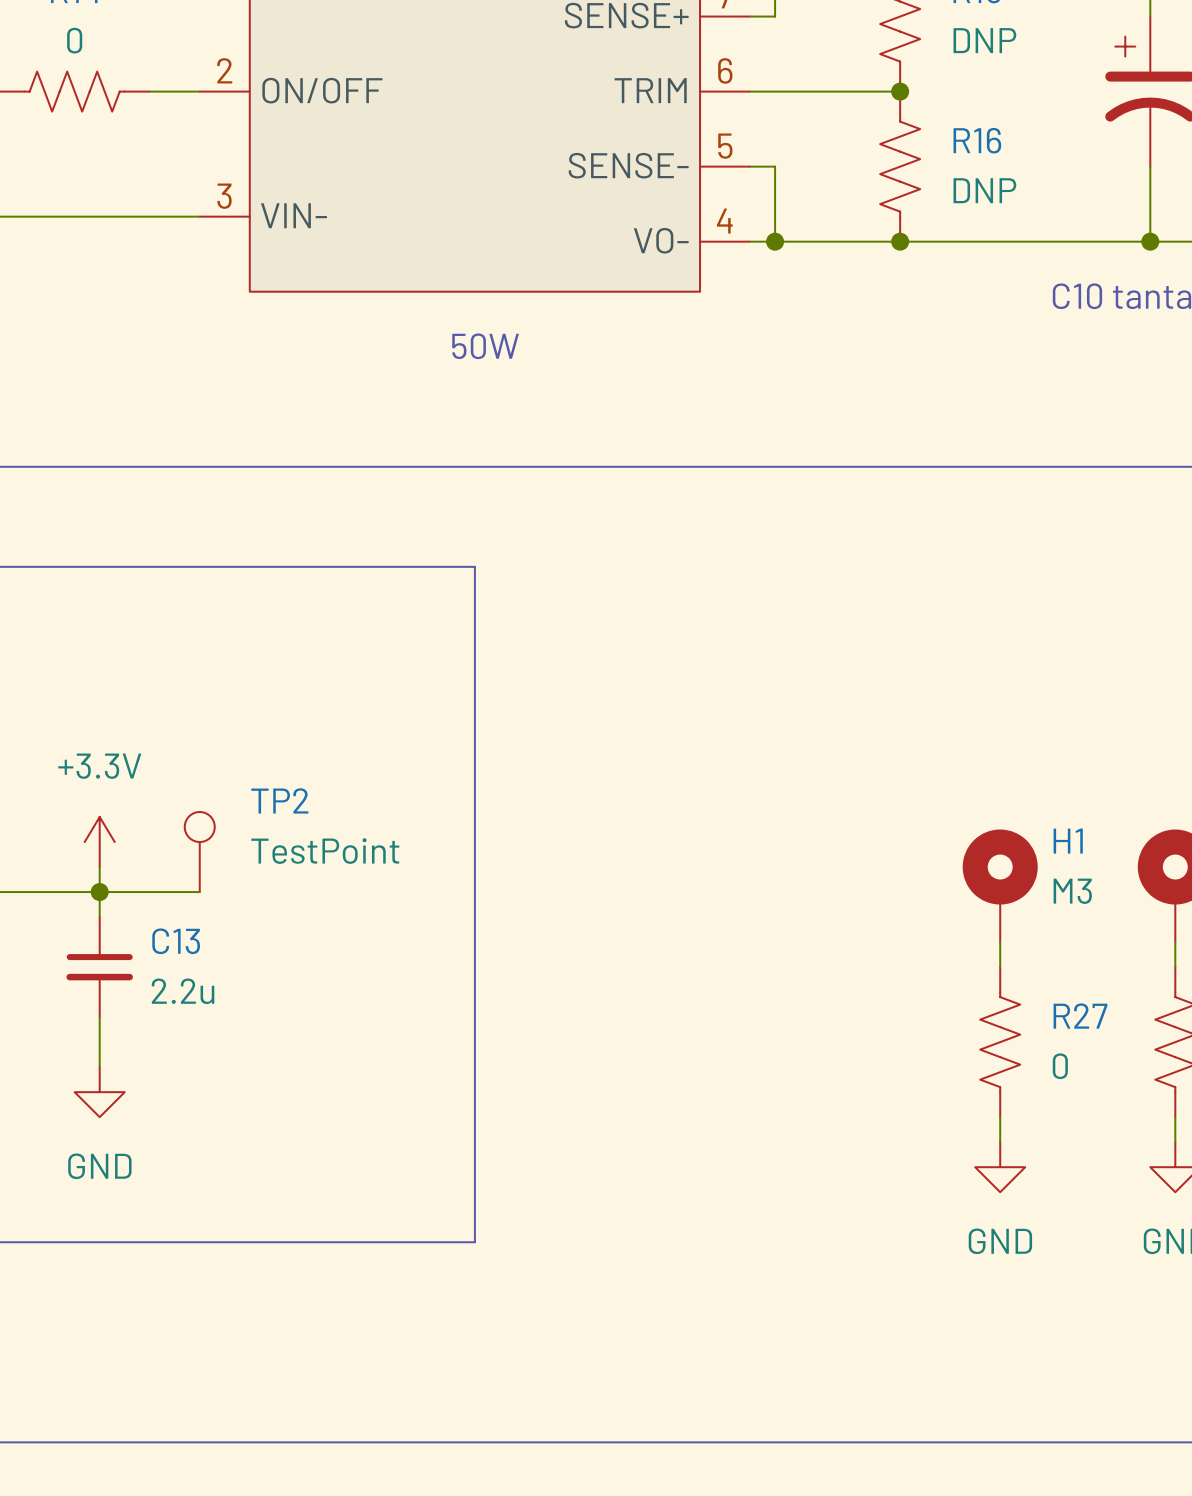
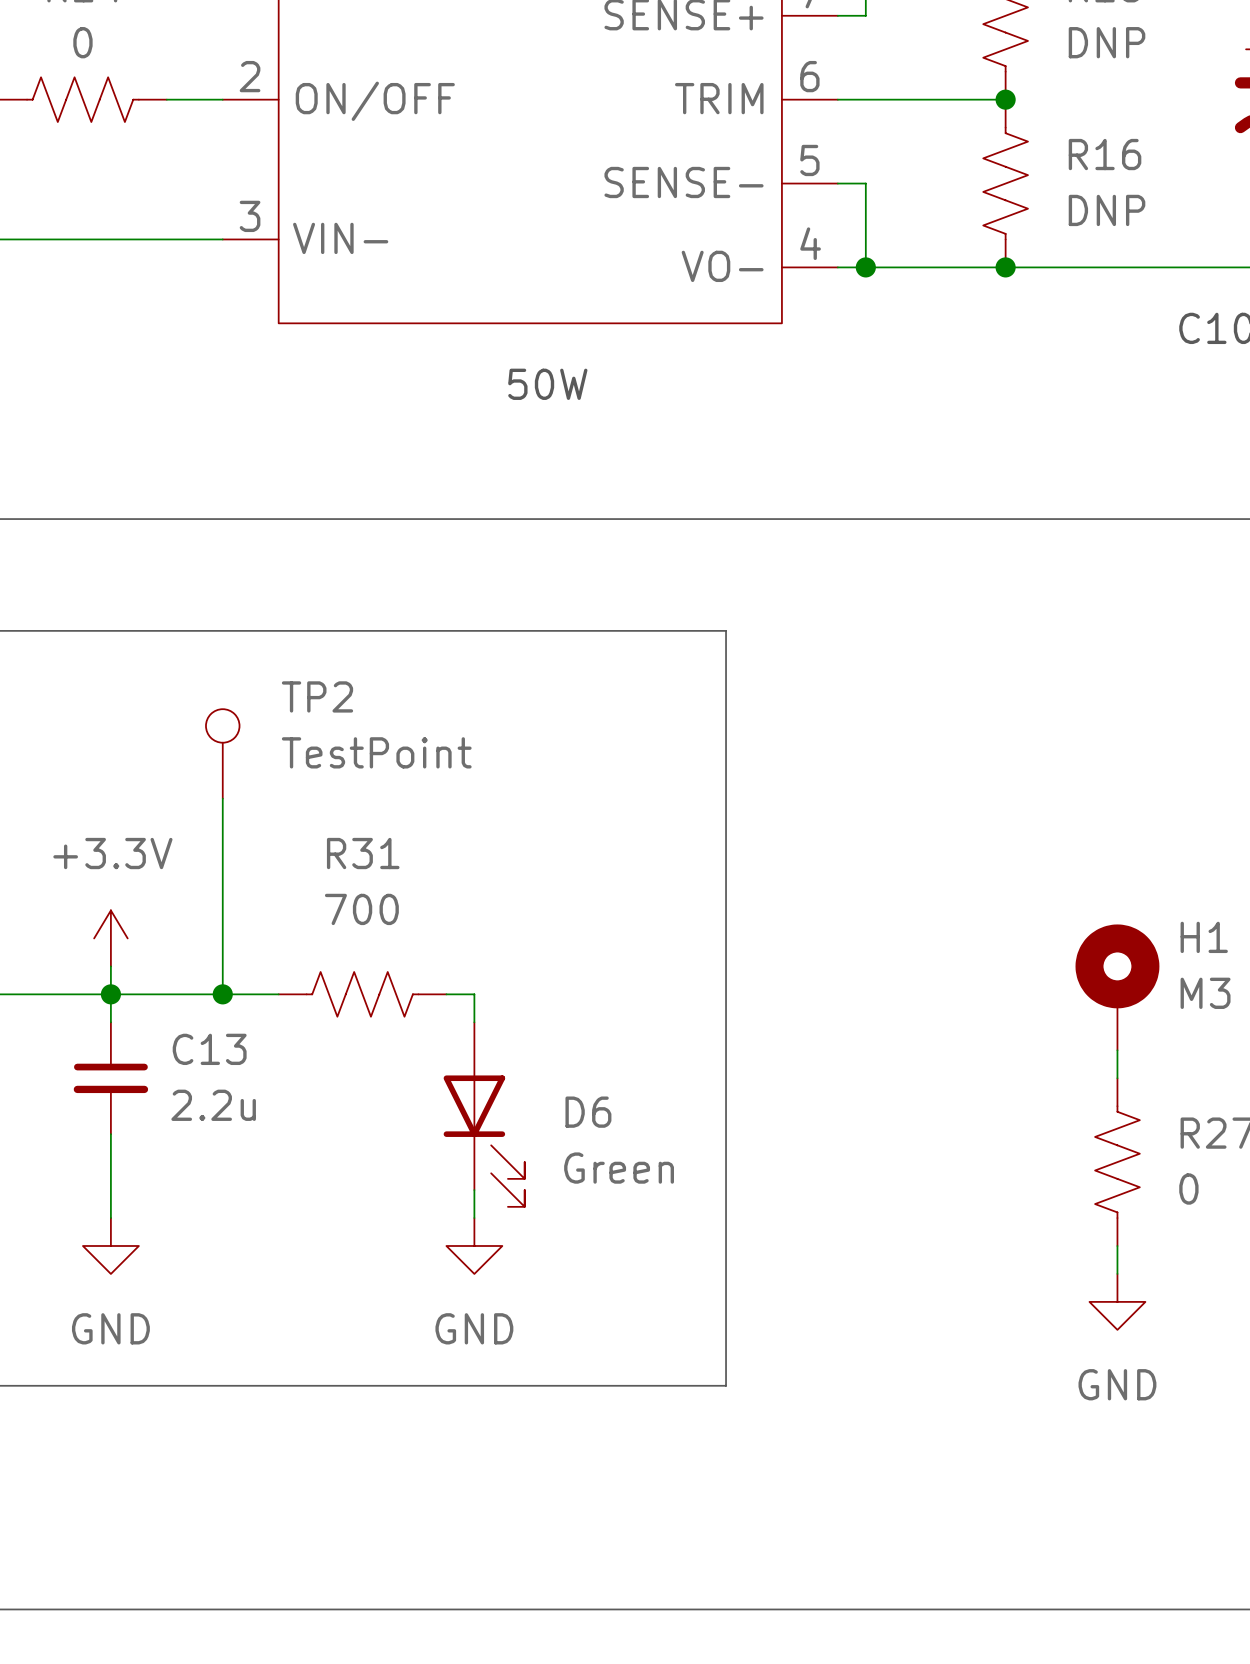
line: (474, 566) (474, 1242) -> (530, 630) (726, 630) (726, 1385) (530, 1385)
wire: none -> (222, 798) (222, 994) (278, 994)
TP2 position: (199, 852) -> (222, 753)
junction: none -> (222, 994)
R31: none -> 700 (362, 994)
wire: none -> (446, 994) (474, 994) (474, 1022)
D6: none -> Green (484, 1114)
wire: none -> (474, 1190) (474, 1218)
power symbol position: GND (99, 1092) -> GND (110, 1245)
power symbol: none -> GND (474, 1245)

